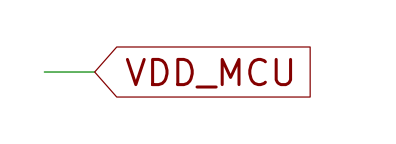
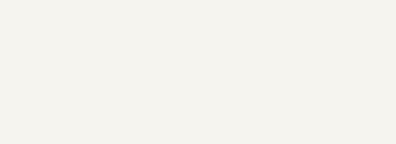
wire: (44, 72) (94, 72) -> none
global label: VDD_MCU (208, 73) -> none

